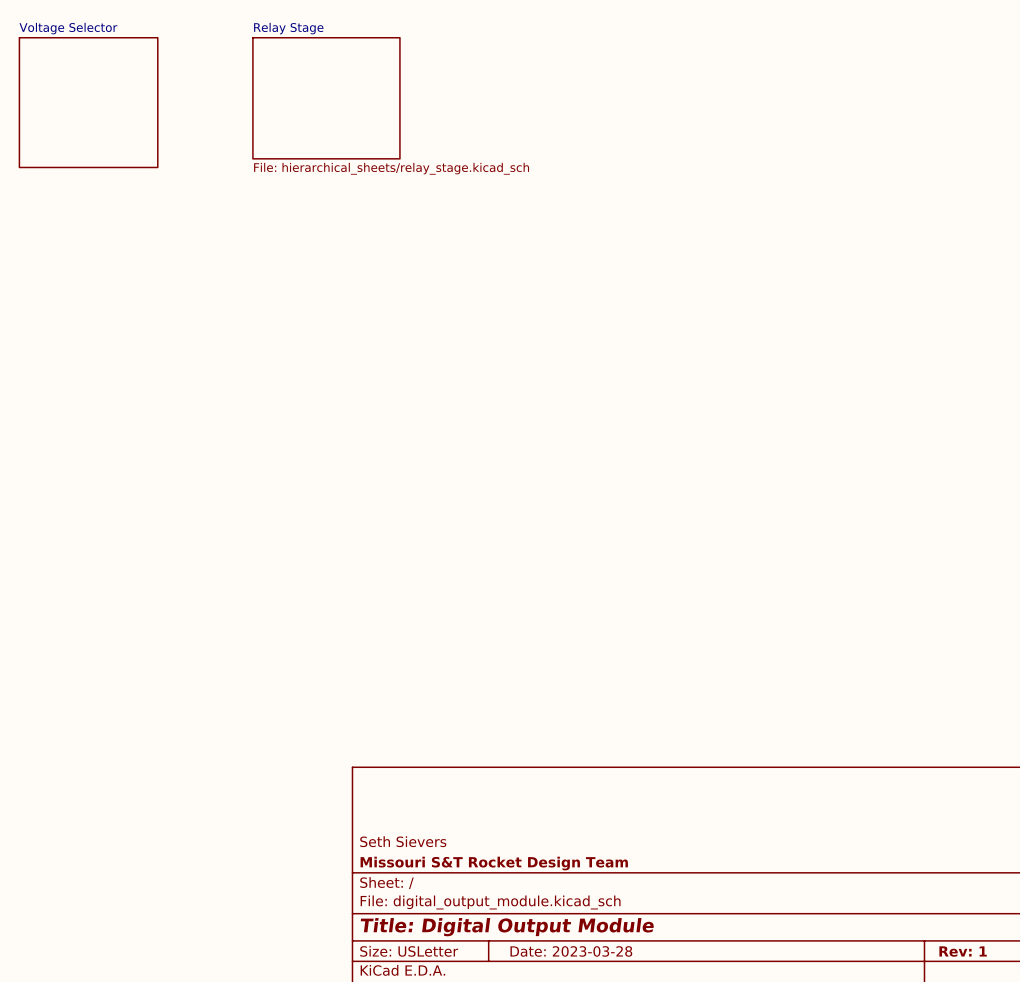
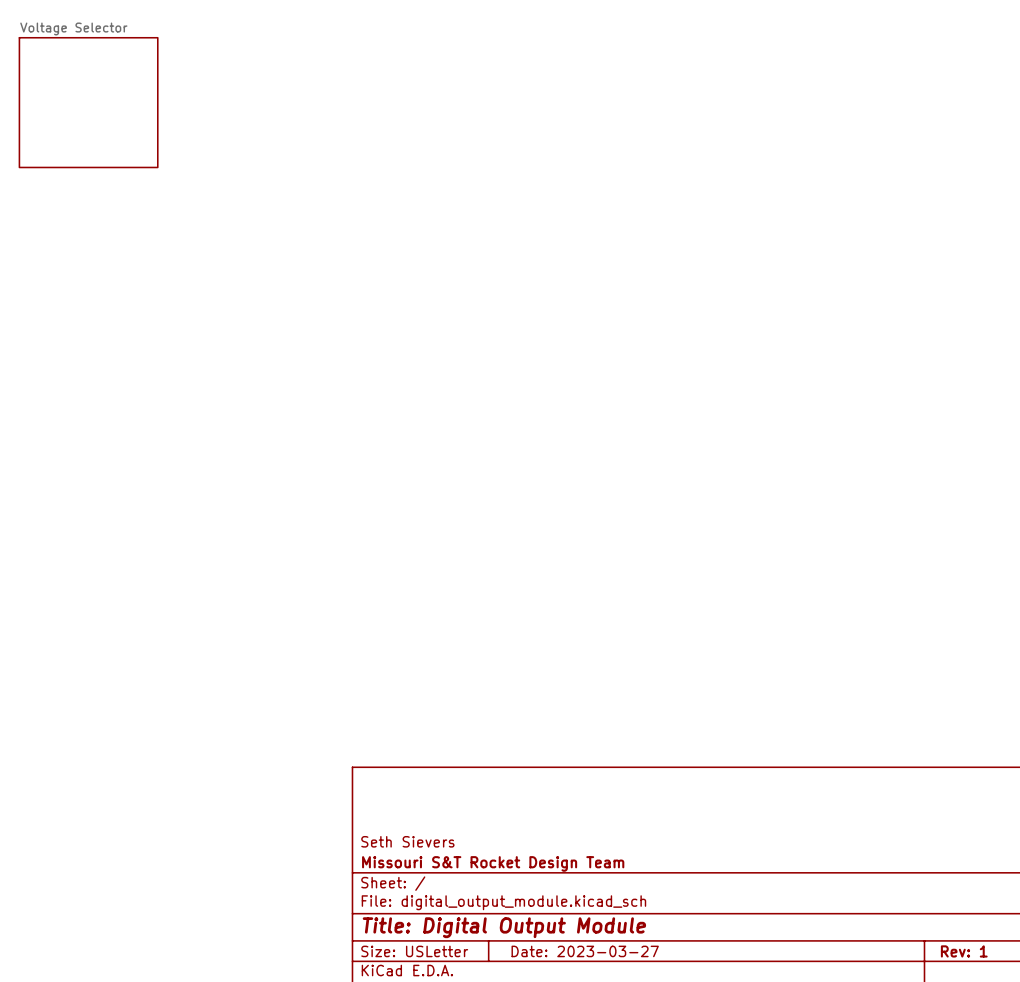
sheet Relay Stage: File: hierarchical_sheets/relay_stage.kicad_sch (326, 98) -> none
title block: Date: 2023-03-28 (571, 951) -> Date: 2023-03-27 (585, 951)

